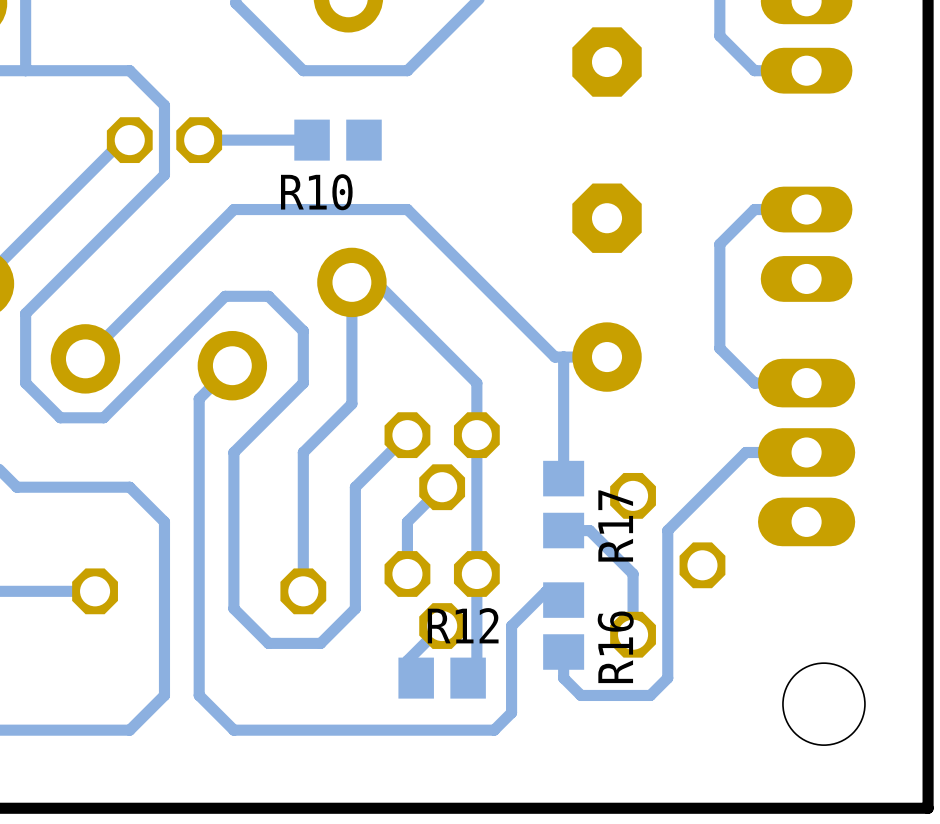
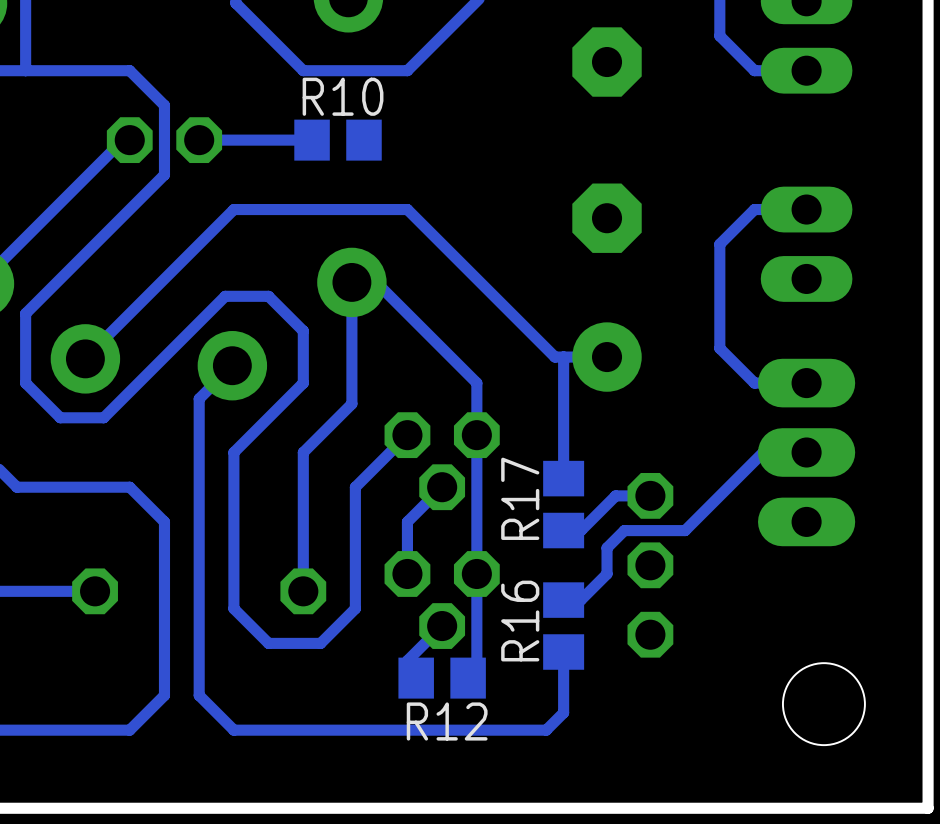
R10 name position: R10 (316, 192) -> R10 (343, 96)
bottom track: (763, 452) (745, 452) (667, 530) (667, 678) (650, 695) (580, 695) (563, 678) -> (763, 452) (685, 530) (624, 530) (607, 547) (607, 573) (580, 600) (563, 600)
part footprint: [610, 472, 726, 658] -> [627, 472, 674, 658]
R17 name position: R17 (615, 526) -> R17 (520, 498)
bottom track: (580, 530) (589, 530) (633, 573) (633, 634) -> (580, 530) (615, 495) (650, 495)
bottom track: (563, 600) (563, 591) (546, 591) (511, 626) (511, 712) (494, 730) -> (563, 678) (563, 712) (546, 730) (494, 730)
R12 name position: R12 (463, 625) -> R12 (447, 721)
R16 name position: R16 (615, 647) -> R16 (520, 621)

